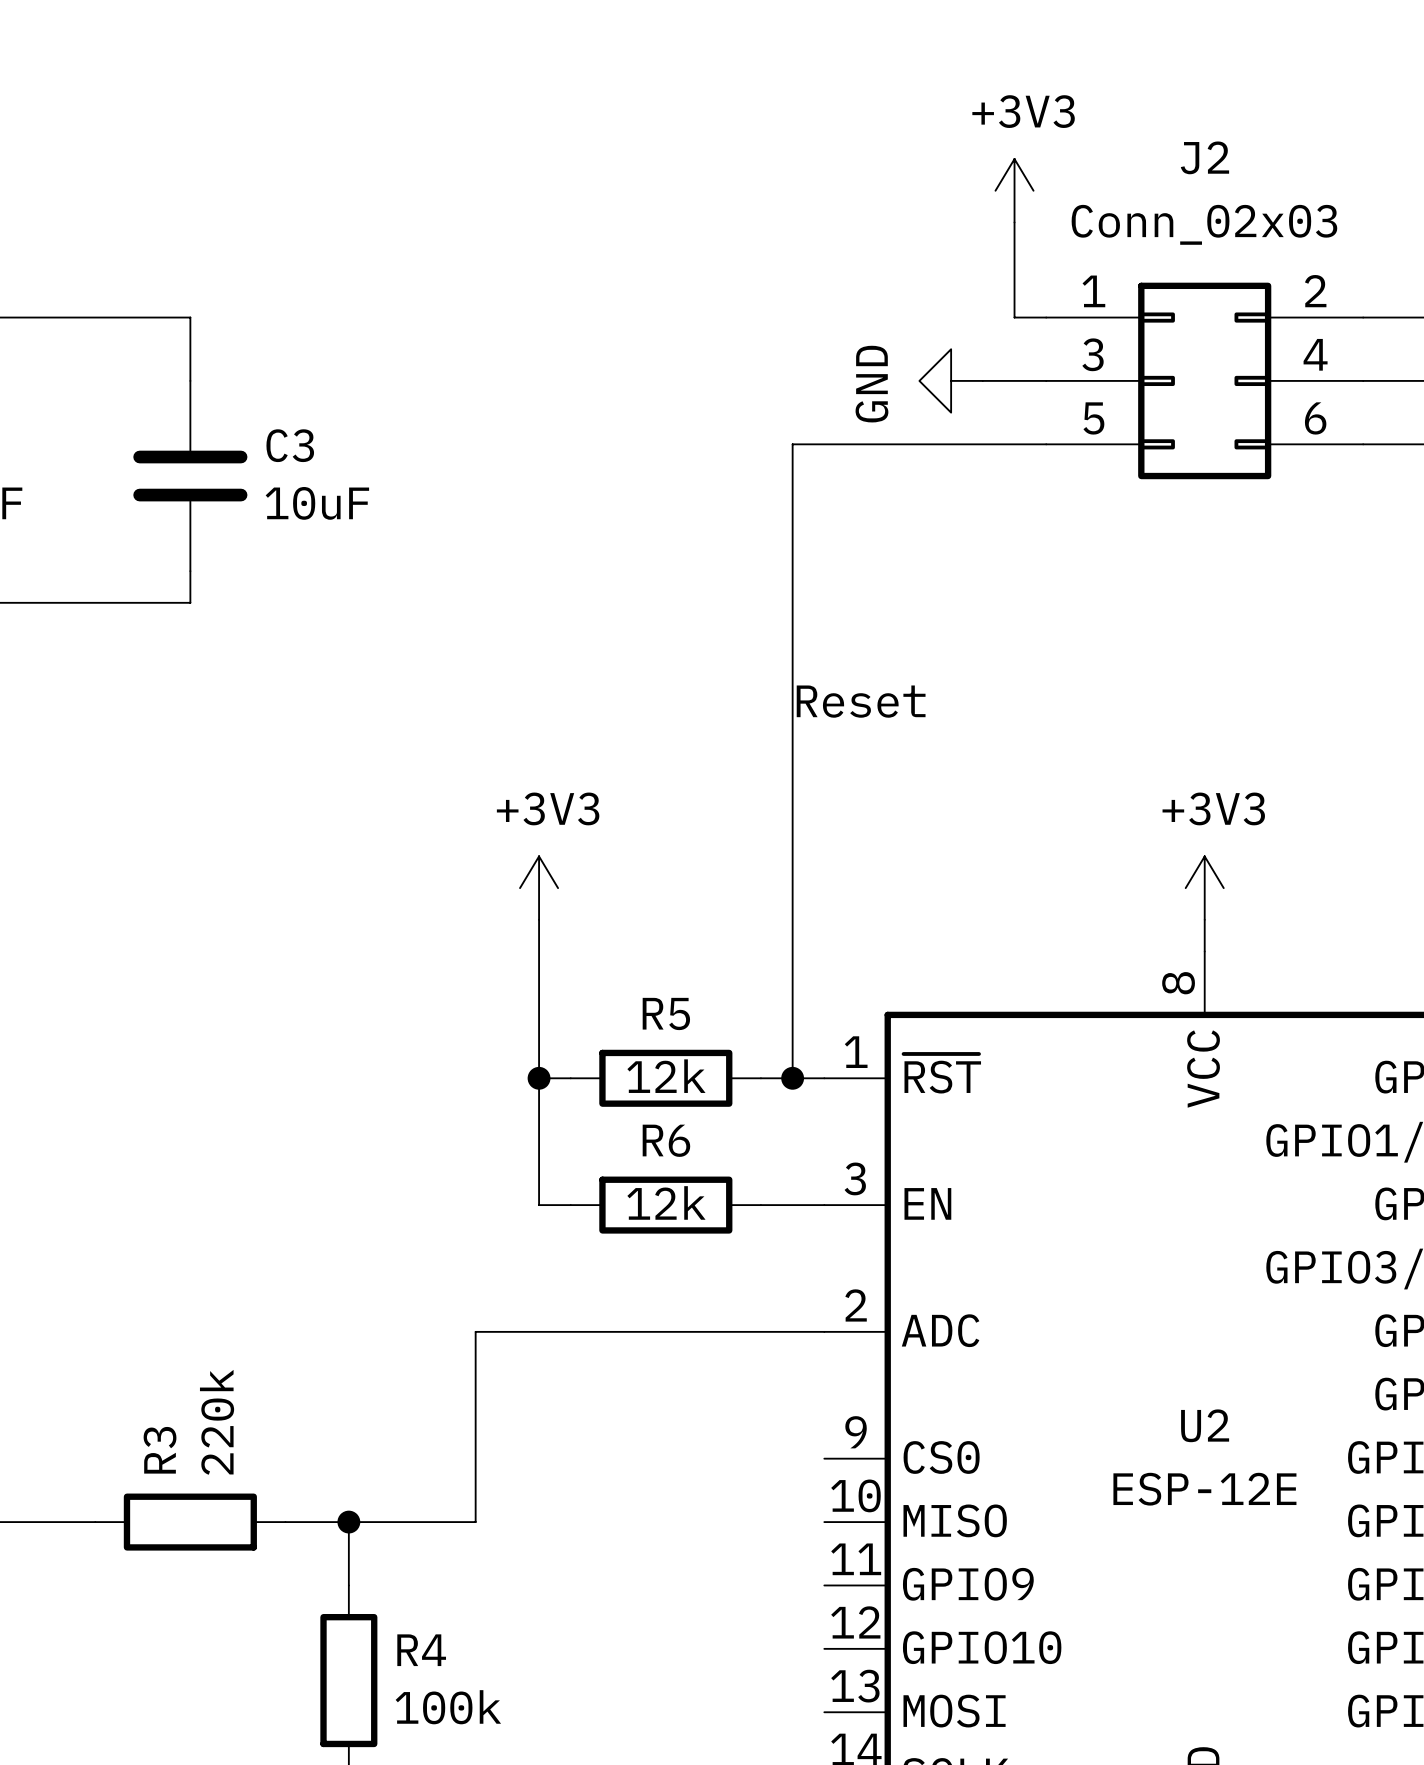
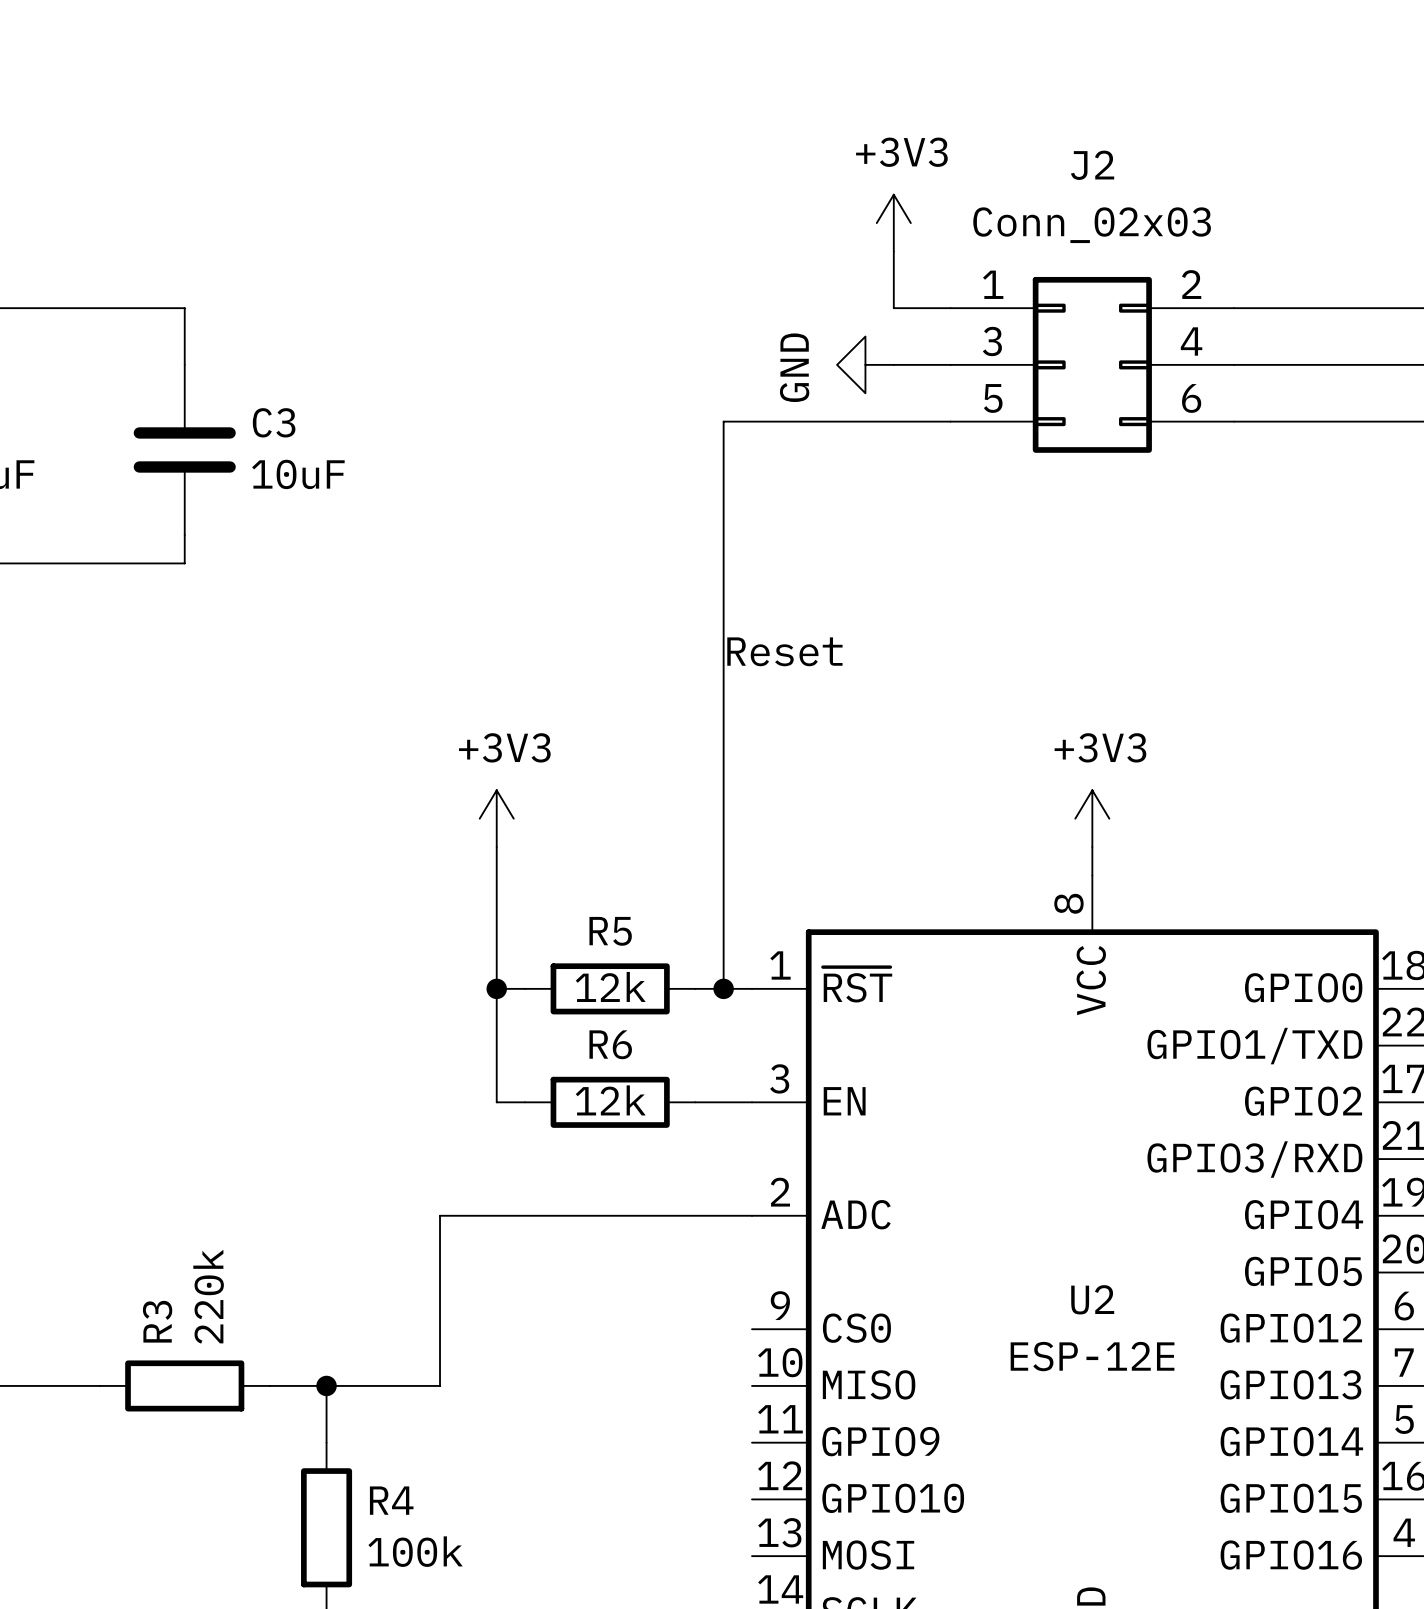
power symbol position: +3V3 (1014, 190) -> +3V3 (893, 223)
wire: (1014, 222) (1014, 317) -> (893, 251) (893, 308) (922, 308)

